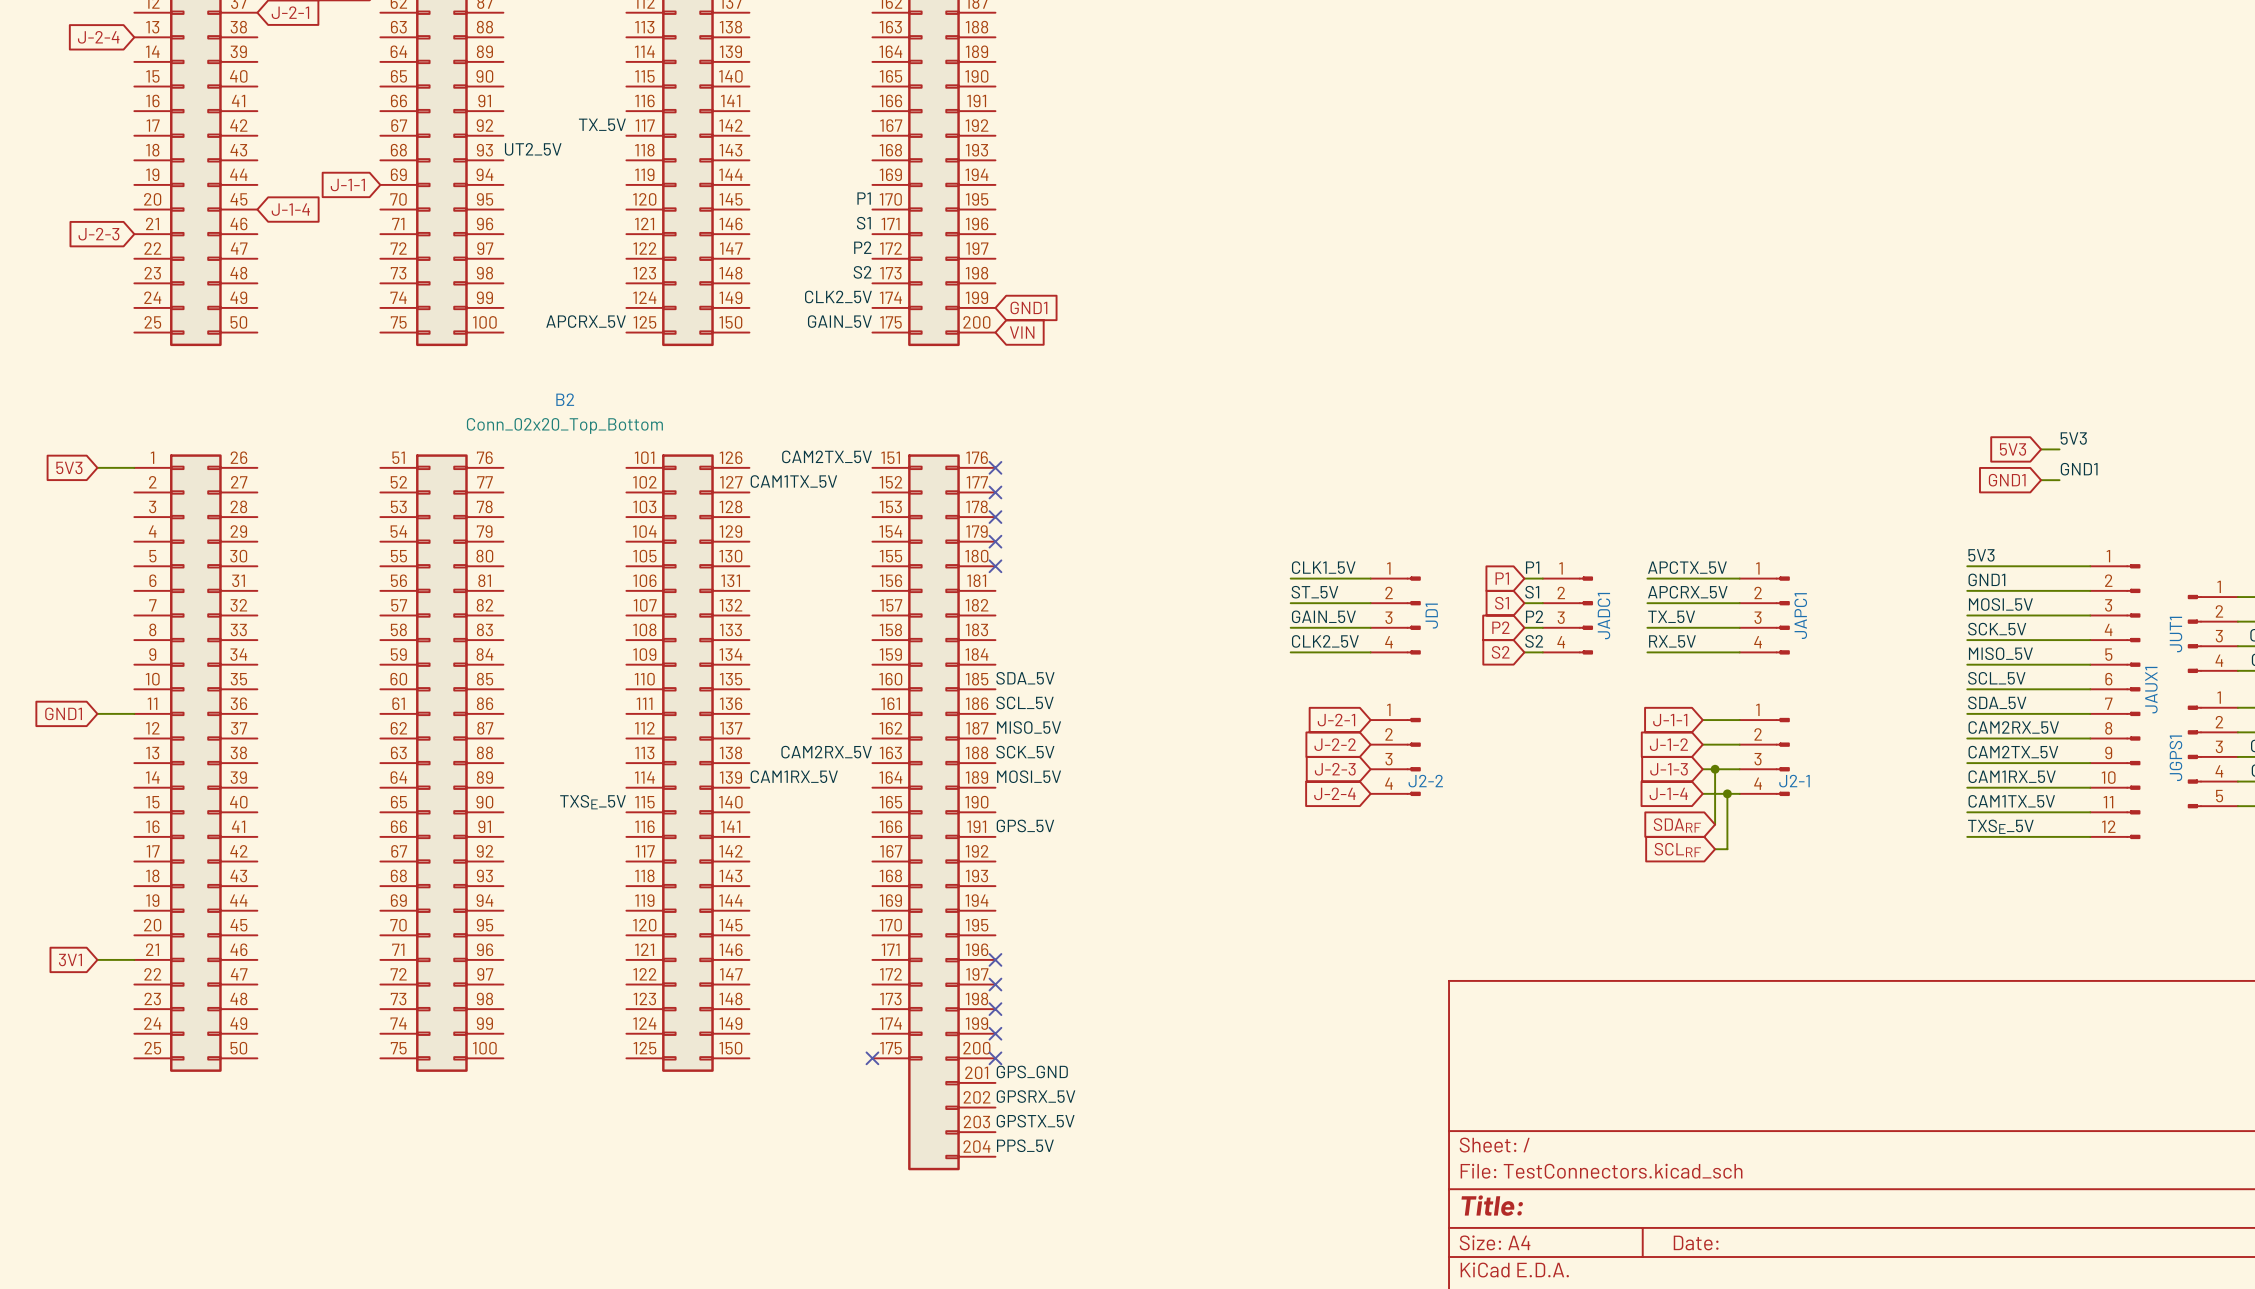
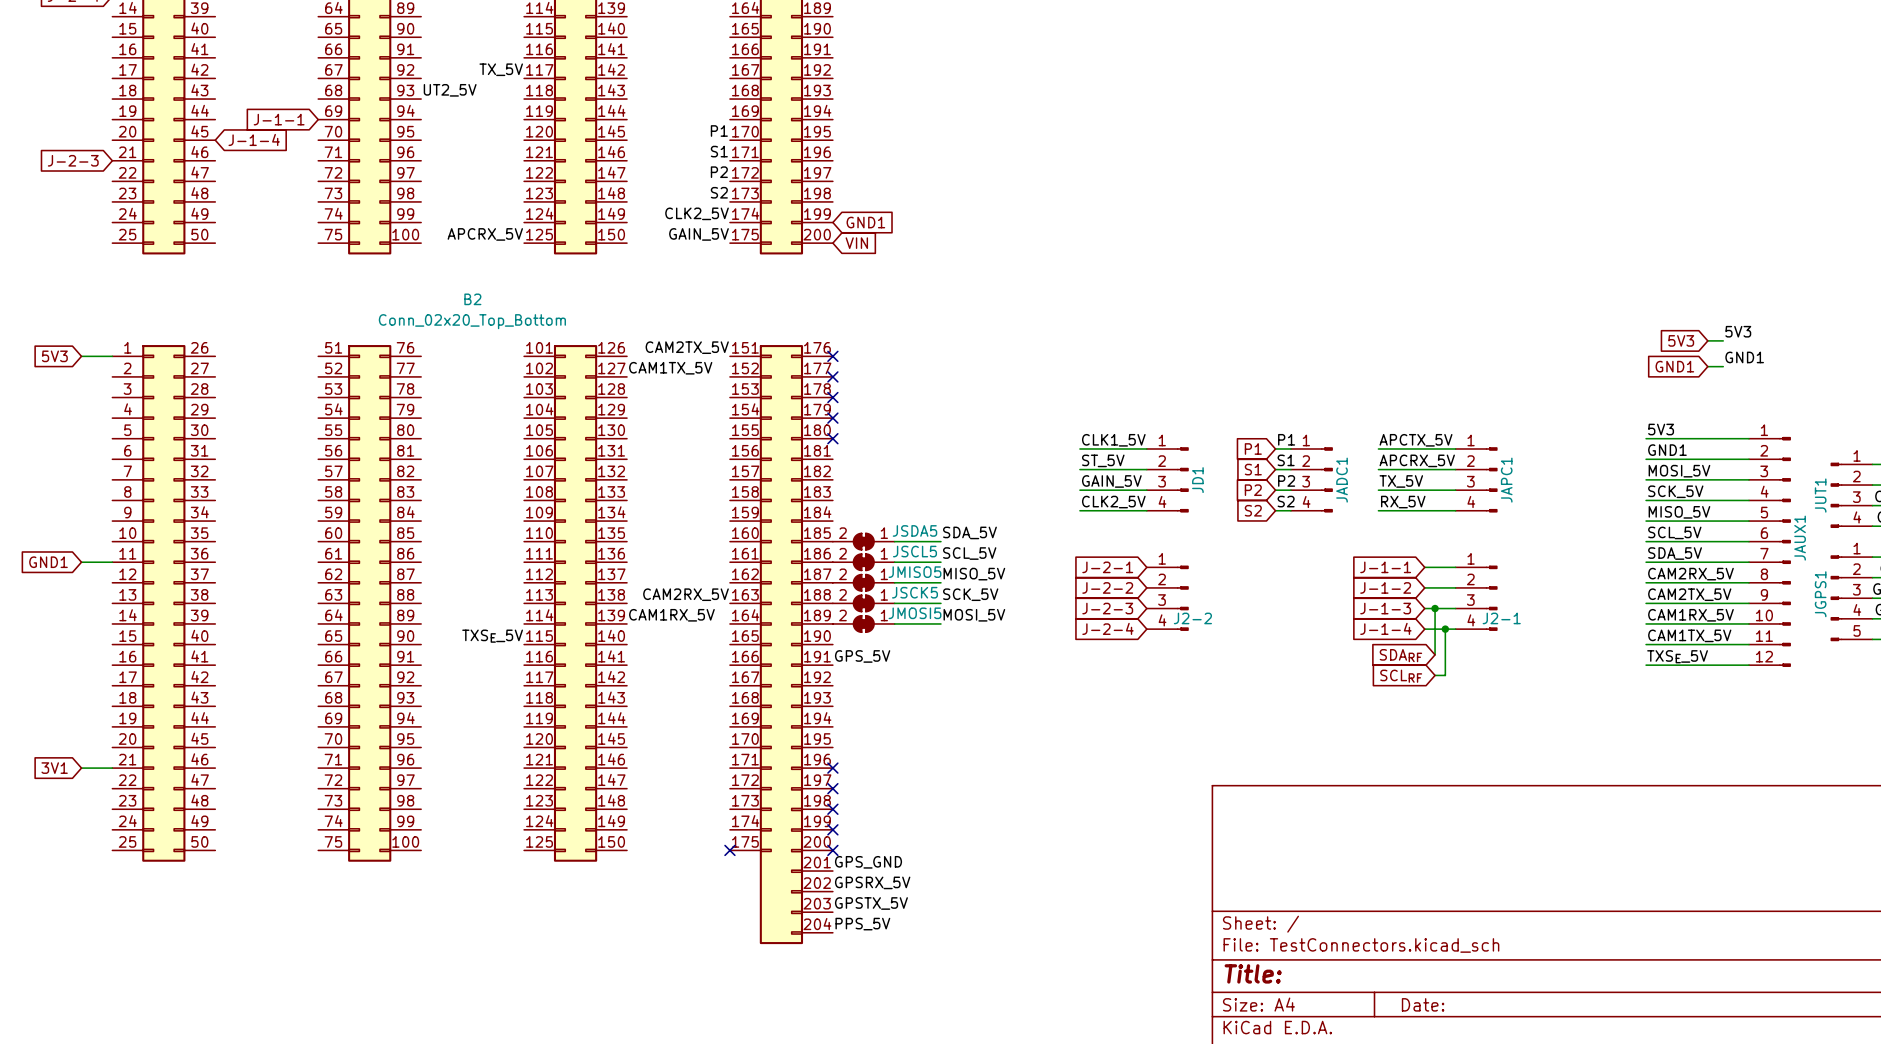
label position: SDA_5V (1025, 678) -> SDA_5V (969, 532)
JSDA5: none -> (863, 541)
wire: none -> (894, 541) (940, 541)
label position: SCL_5V (1025, 702) -> SCL_5V (969, 553)
JSCL5: none -> (863, 562)
wire: none -> (894, 562) (940, 562)
label position: MISO_5V (1029, 727) -> MISO_5V (974, 574)
JMISO5: none -> (863, 582)
wire: none -> (894, 582) (940, 582)
label position: SCK_5V (1025, 752) -> SCK_5V (970, 594)
JSCK5: none -> (863, 603)
wire: none -> (894, 603) (940, 603)
label position: MOSI_5V (1029, 776) -> MOSI_5V (974, 615)
JMOSI5: none -> (863, 623)
wire: none -> (894, 623) (940, 623)

